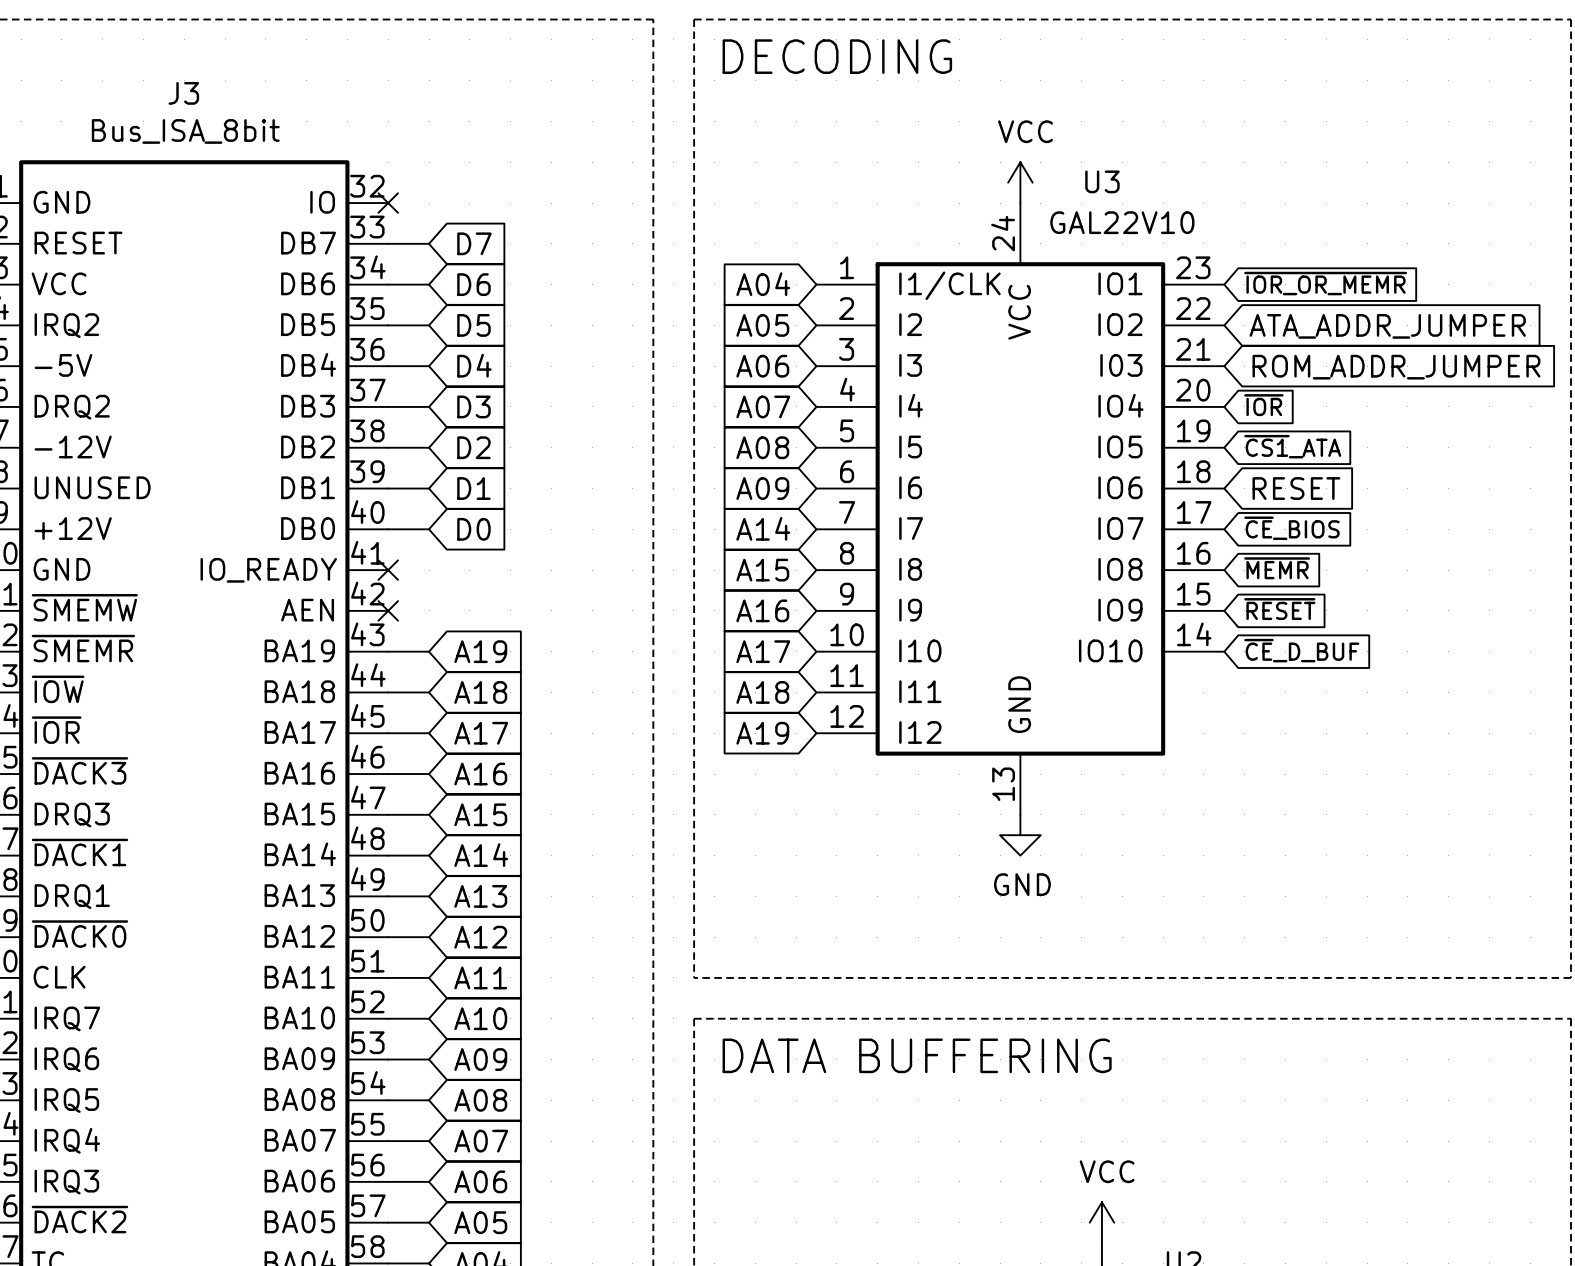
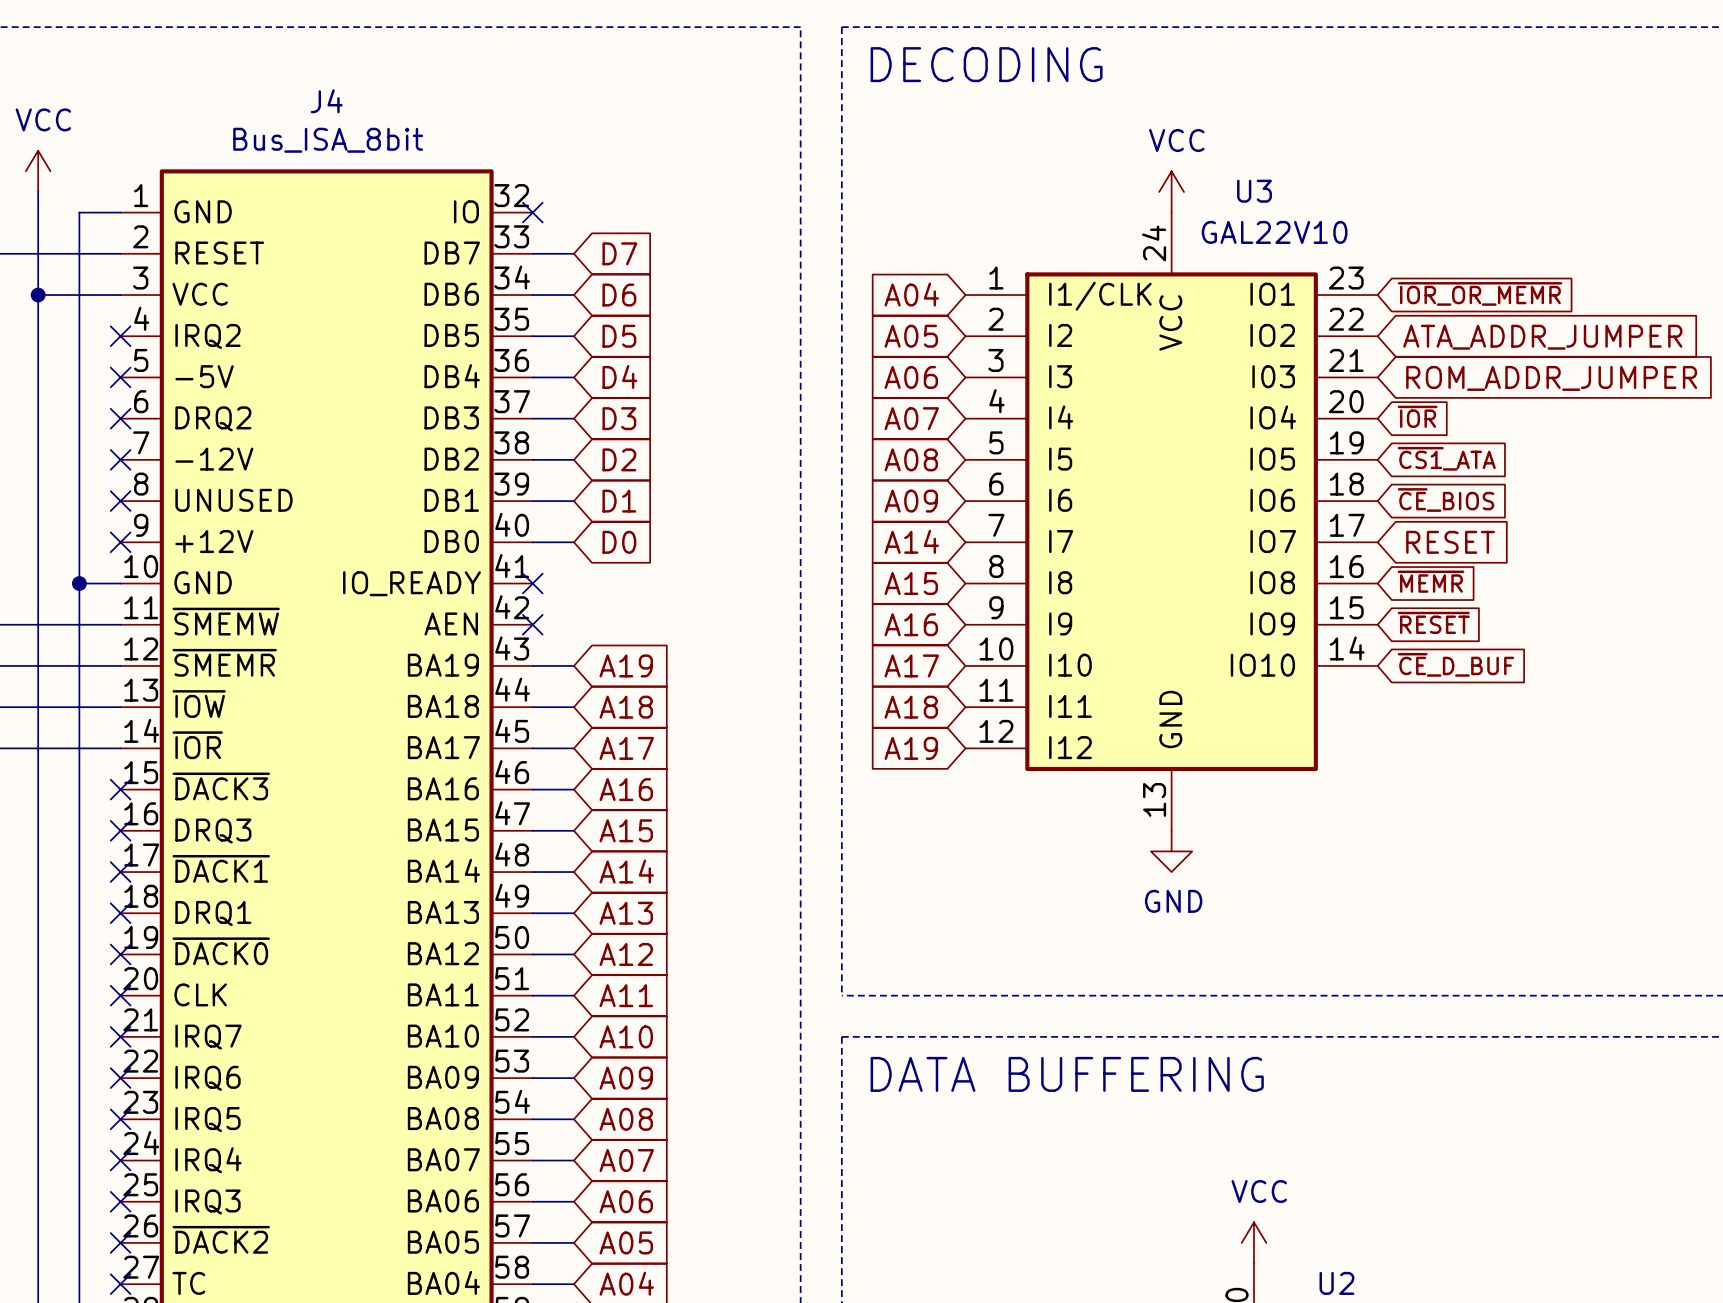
J3 name: J3 (183, 93) -> J4 (326, 101)
global label: RESET (1296, 488) -> ~{CE}_BIOS (1446, 500)
global label: ~{CE}_BIOS (1291, 528) -> RESET (1450, 542)

